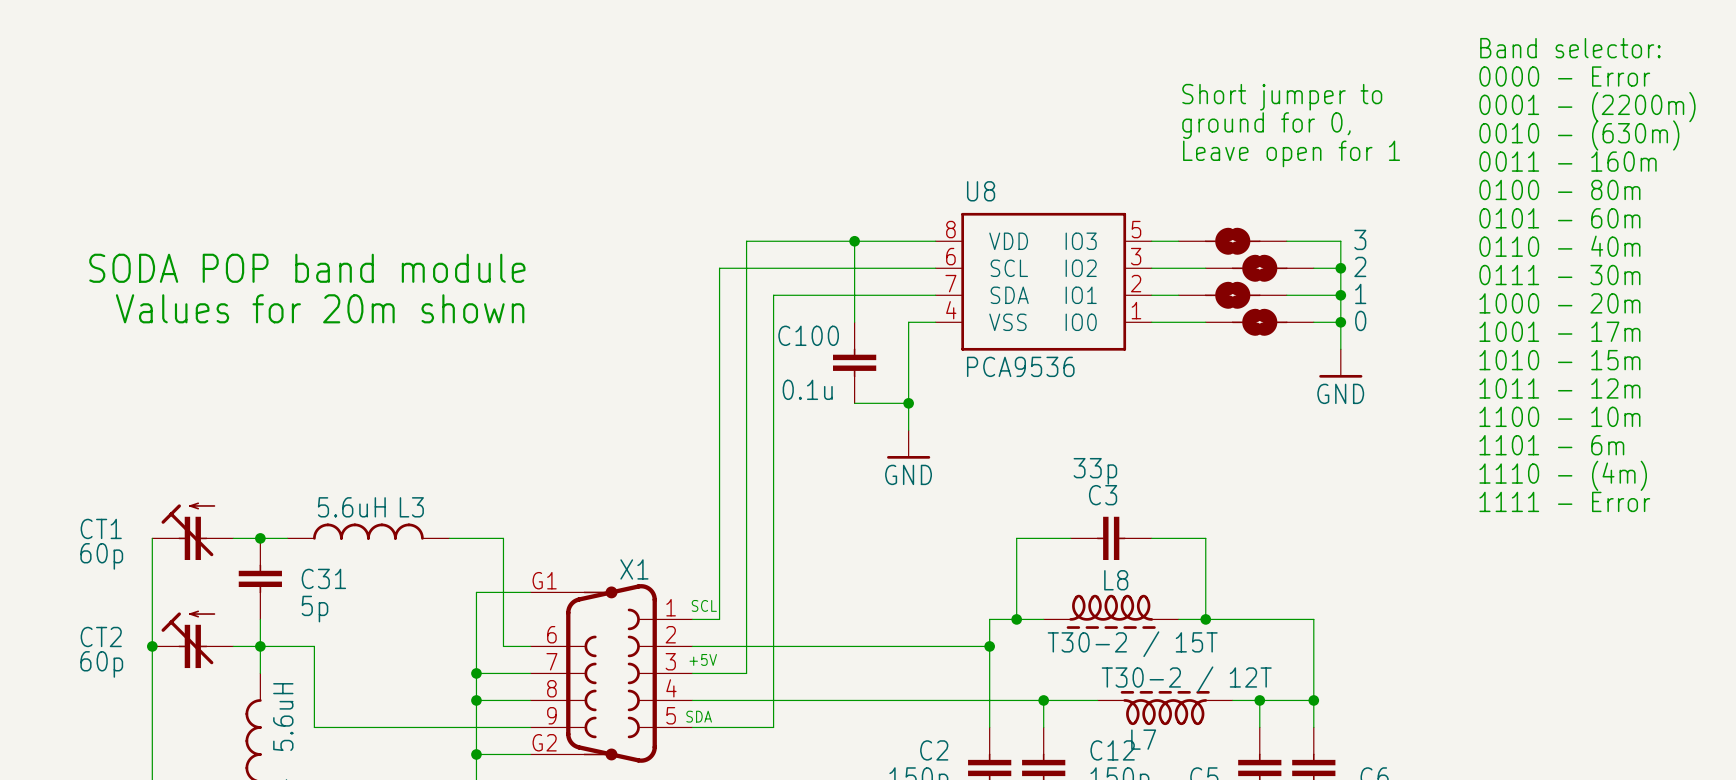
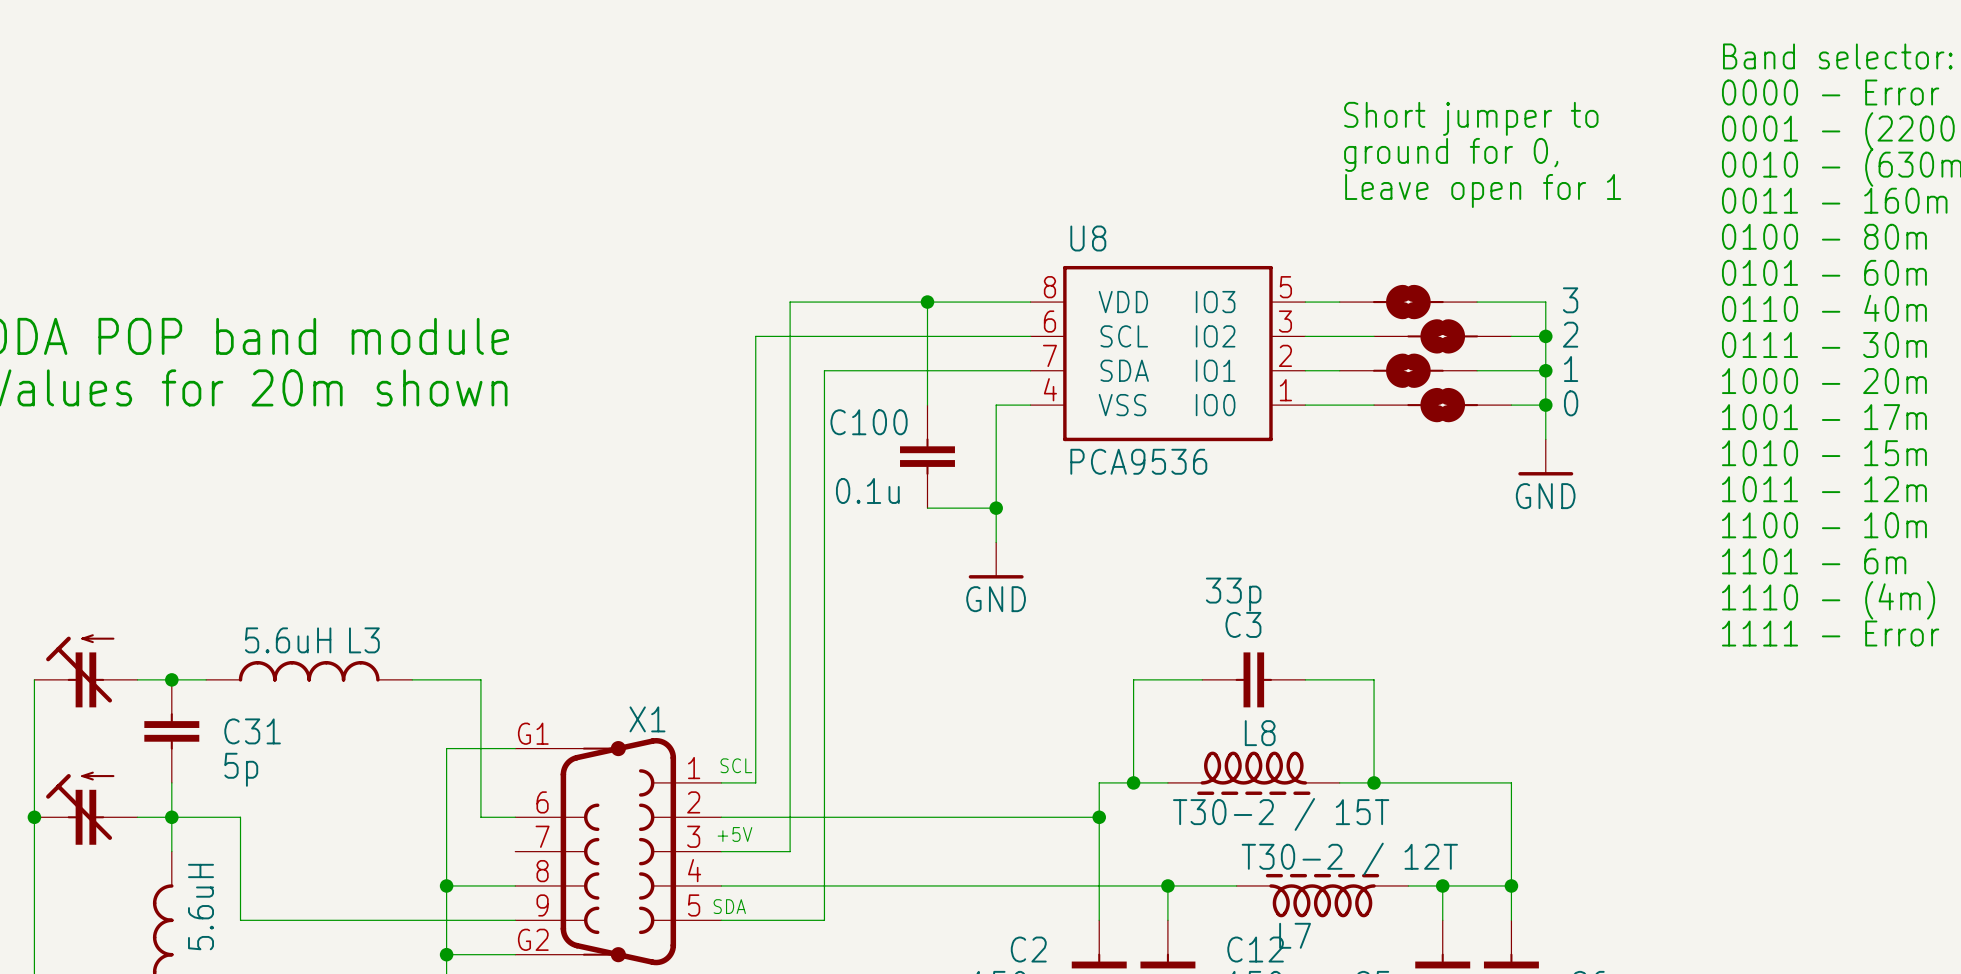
wire: (476, 673) (530, 673) -> none
junction: (476, 673) -> none

